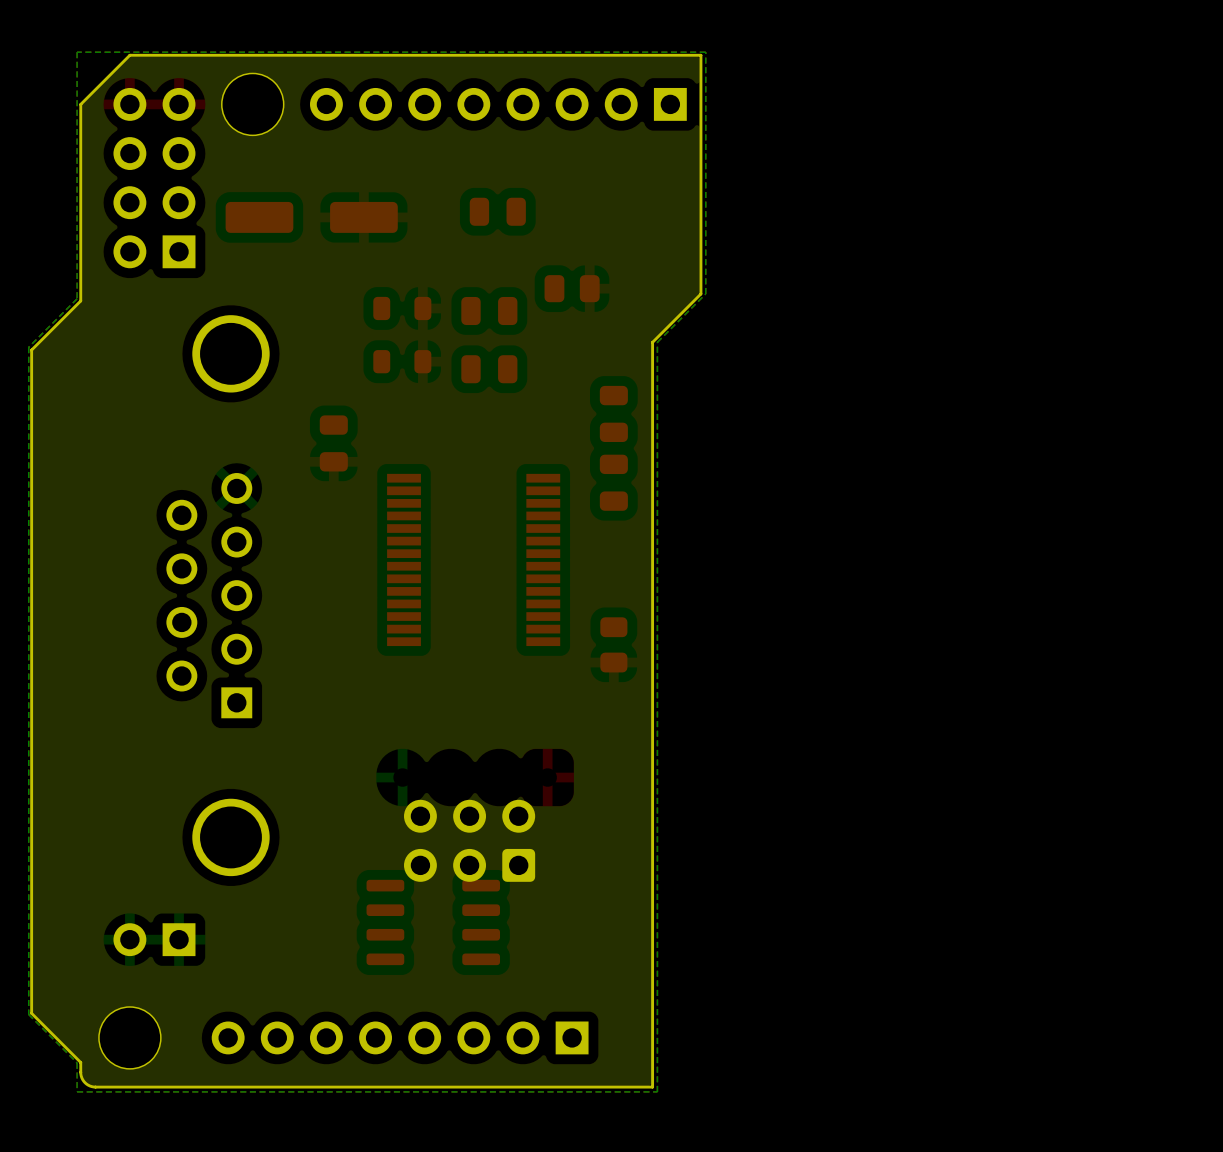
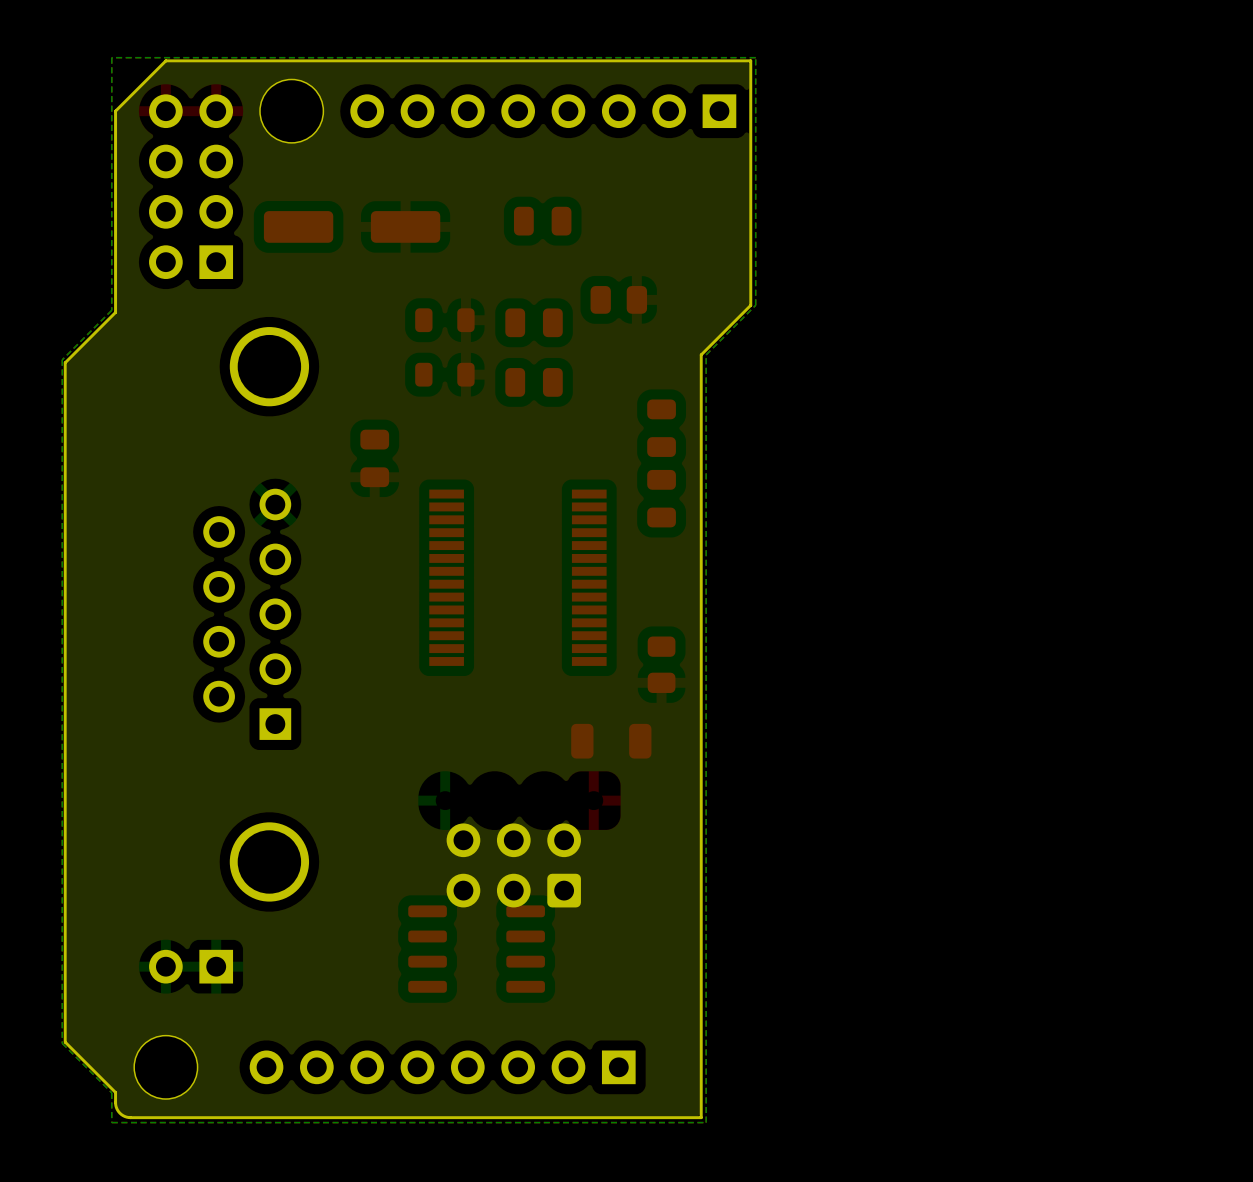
part: none -> (611, 741)

